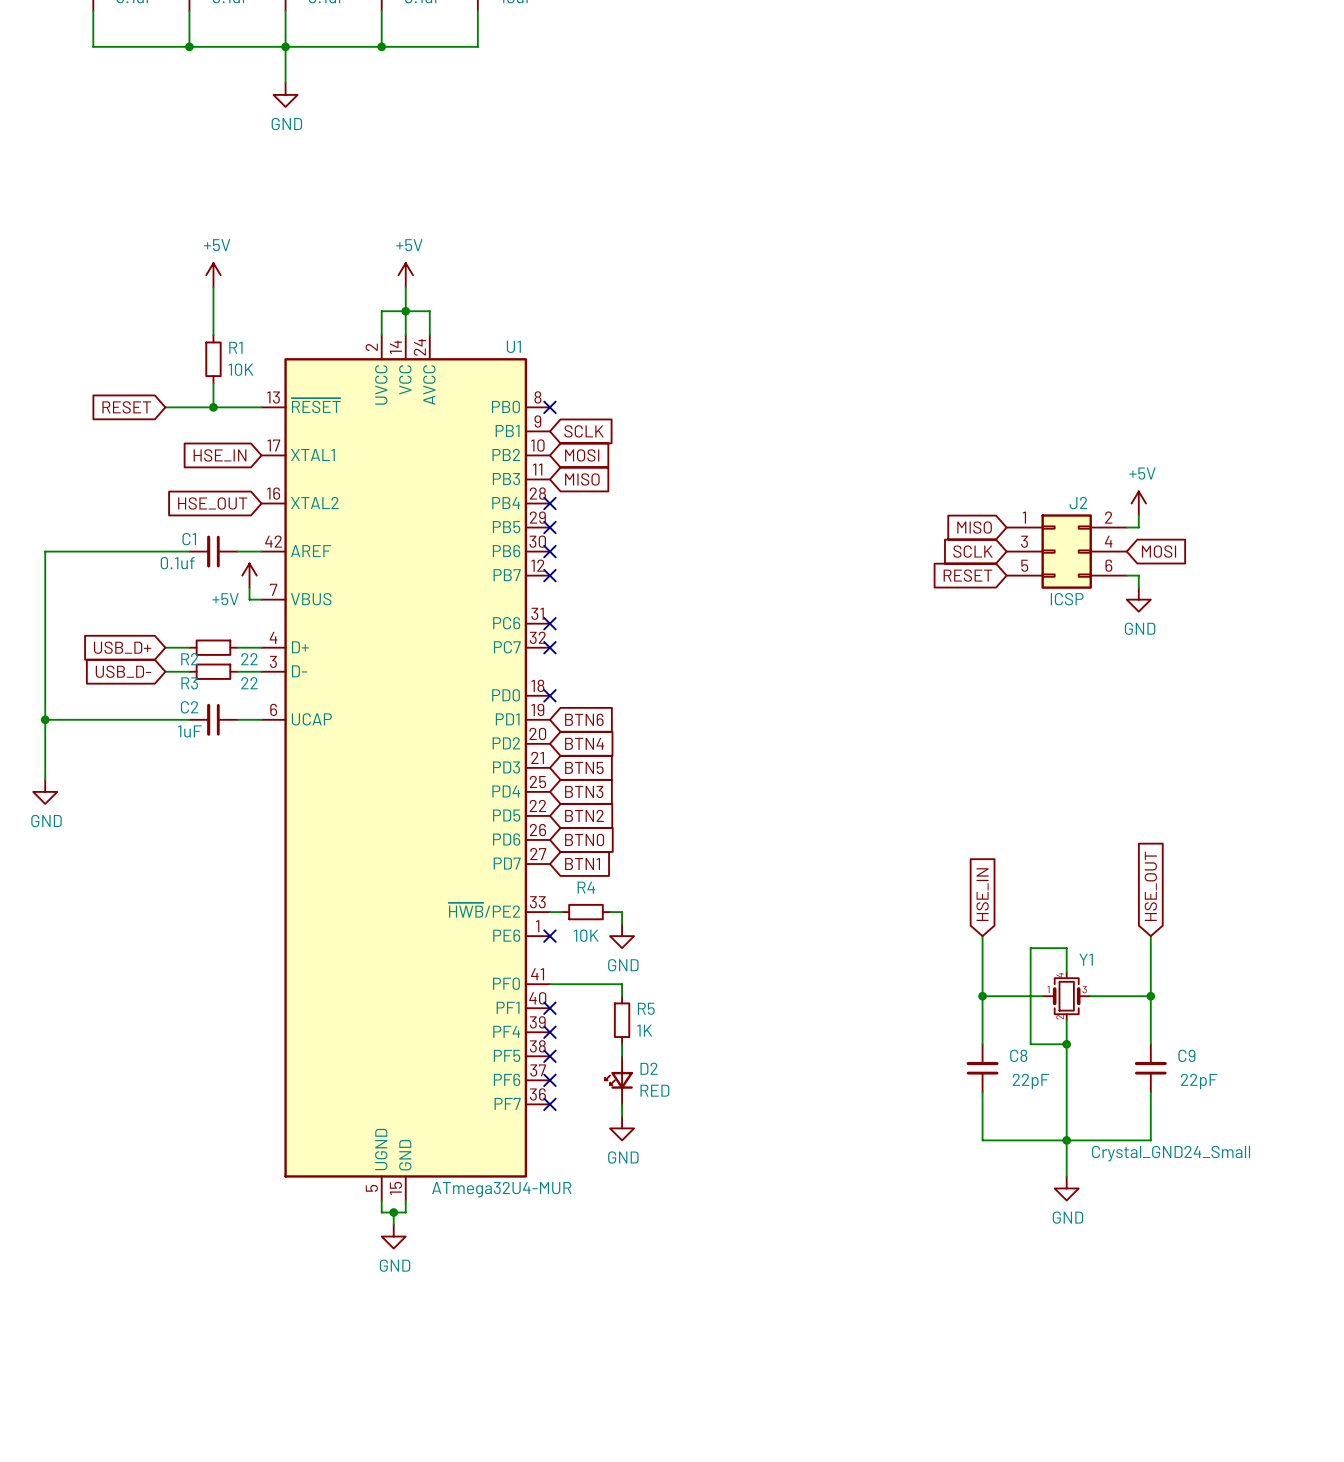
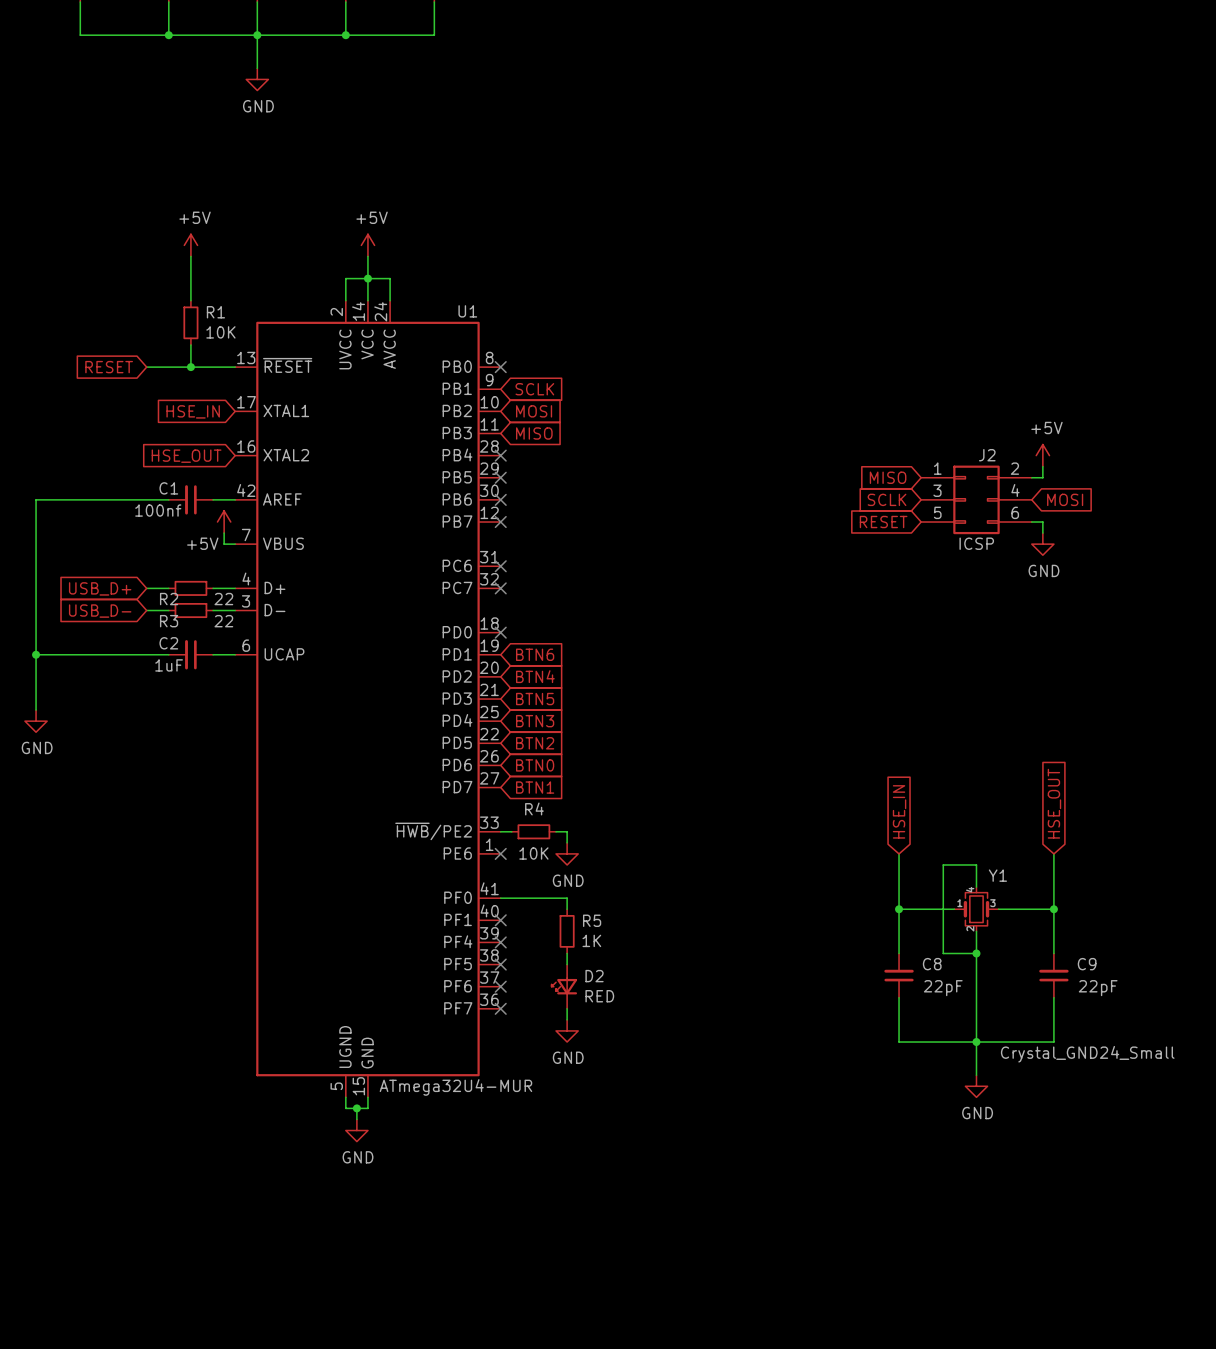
C1 value: 0.1uf (177, 563) -> 100nf (158, 510)

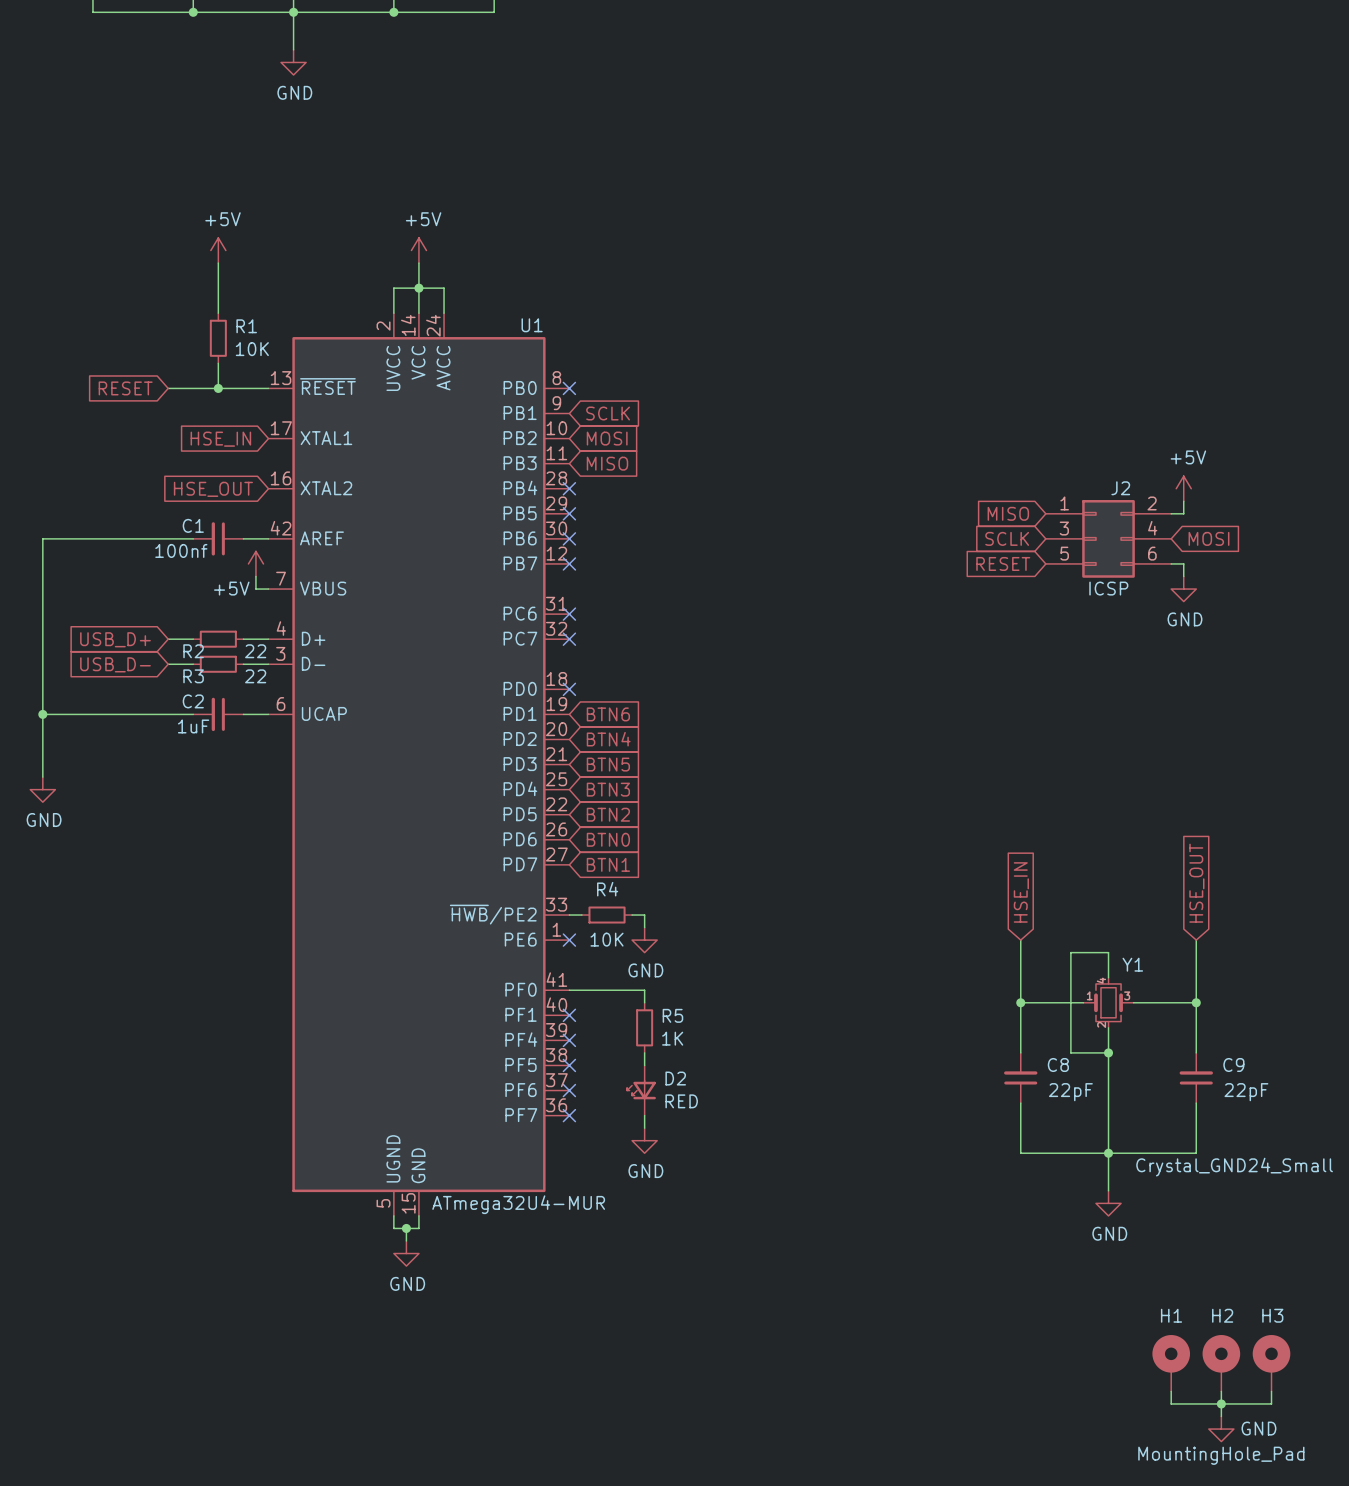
H1: none -> MountingHole_Pad (1171, 1363)
H2: none -> (1221, 1363)
H3: none -> (1271, 1363)
wire: none -> (1171, 1391) (1171, 1403) (1271, 1403) (1271, 1391)
wire: none -> (1221, 1391) (1221, 1416)
junction: none -> (1221, 1403)
power symbol: none -> GND (1221, 1429)

